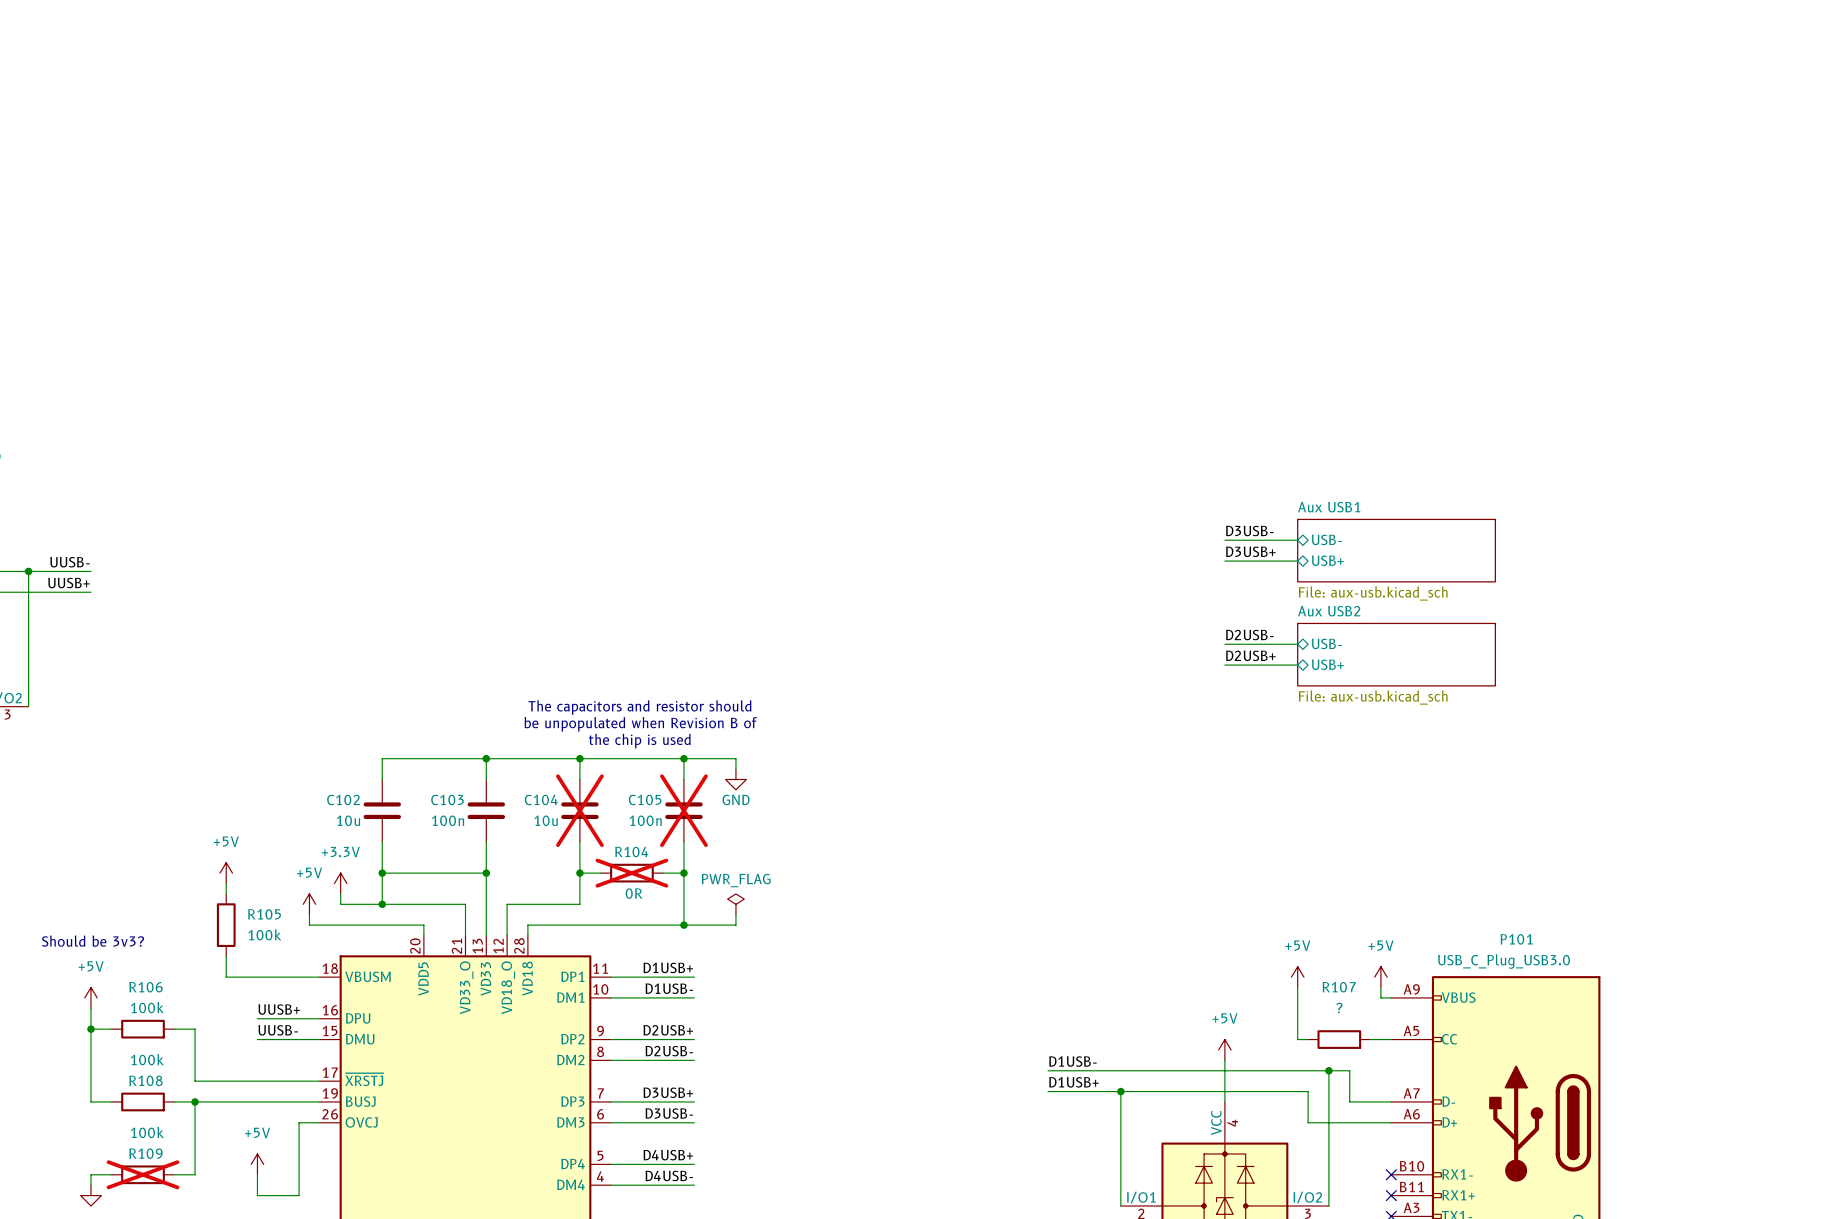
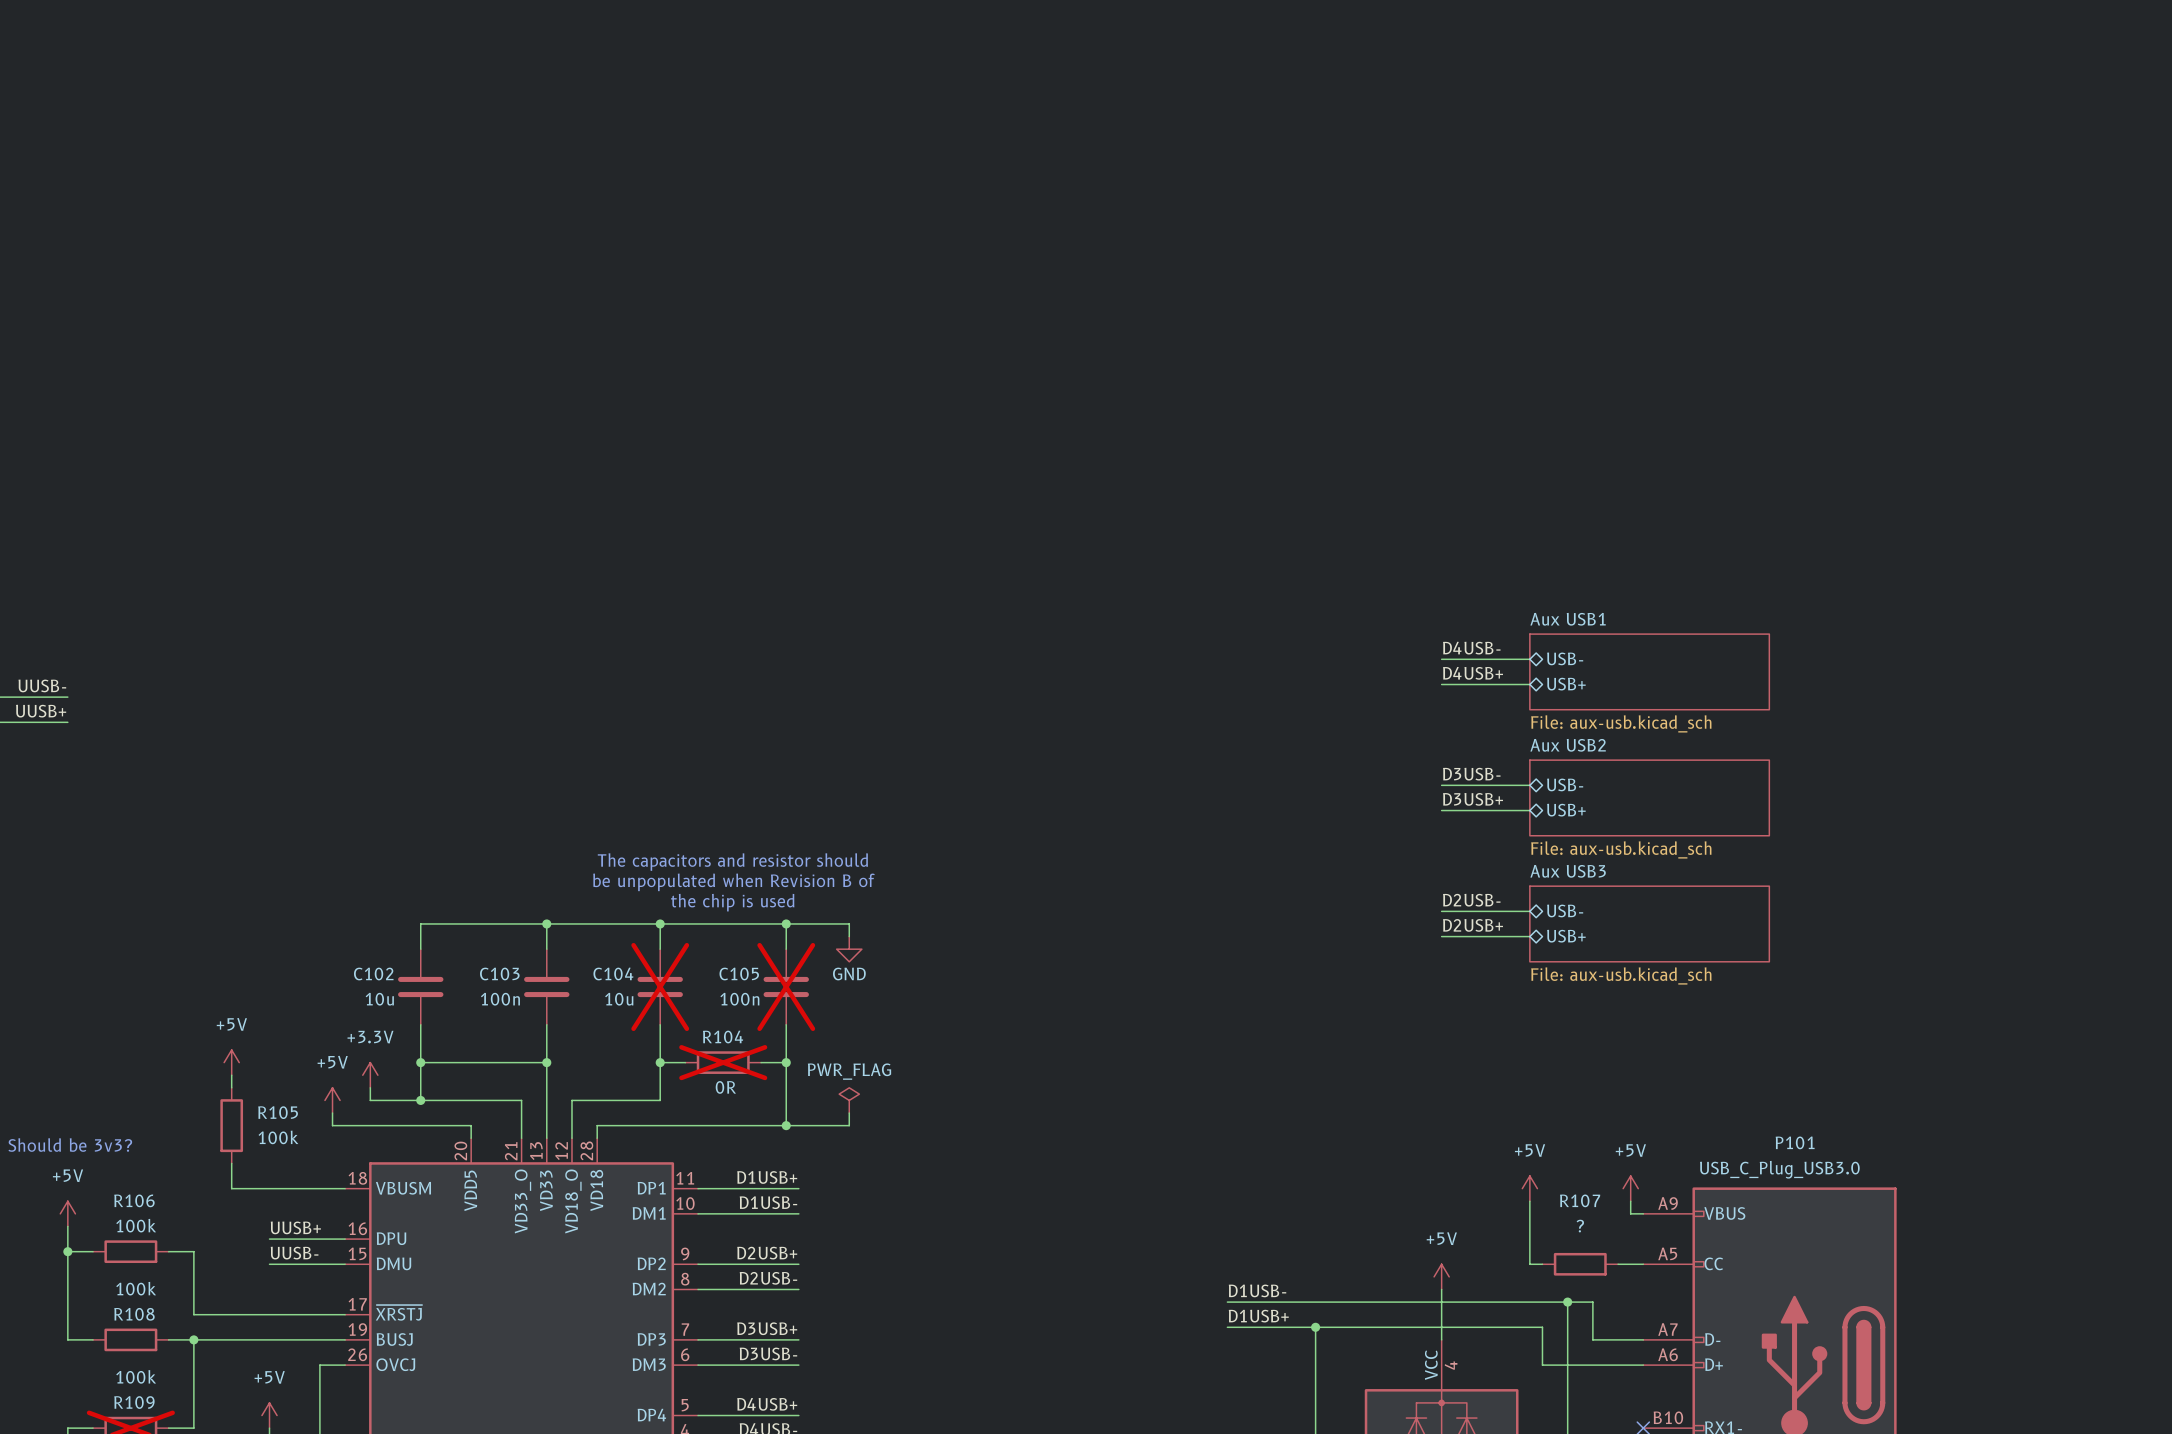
label: D3USB- (1249, 531) -> D4USB- (1471, 648)
label: D3USB+ (1250, 551) -> D4USB+ (1473, 673)
label: D2USB- (1249, 635) -> D3USB- (1471, 774)
label: D2USB+ (1250, 655) -> D3USB+ (1473, 799)
label: none -> D2USB- (1471, 900)
sheet pin: none -> USB- (1565, 910)
wire: none -> (1441, 911) (1529, 911)
sheet Aux USB3: none -> File: aux-usb.kicad_sch (1649, 923)
label: none -> D2USB+ (1473, 925)
sheet pin: none -> USB+ (1566, 936)
wire: none -> (1441, 936) (1529, 936)

